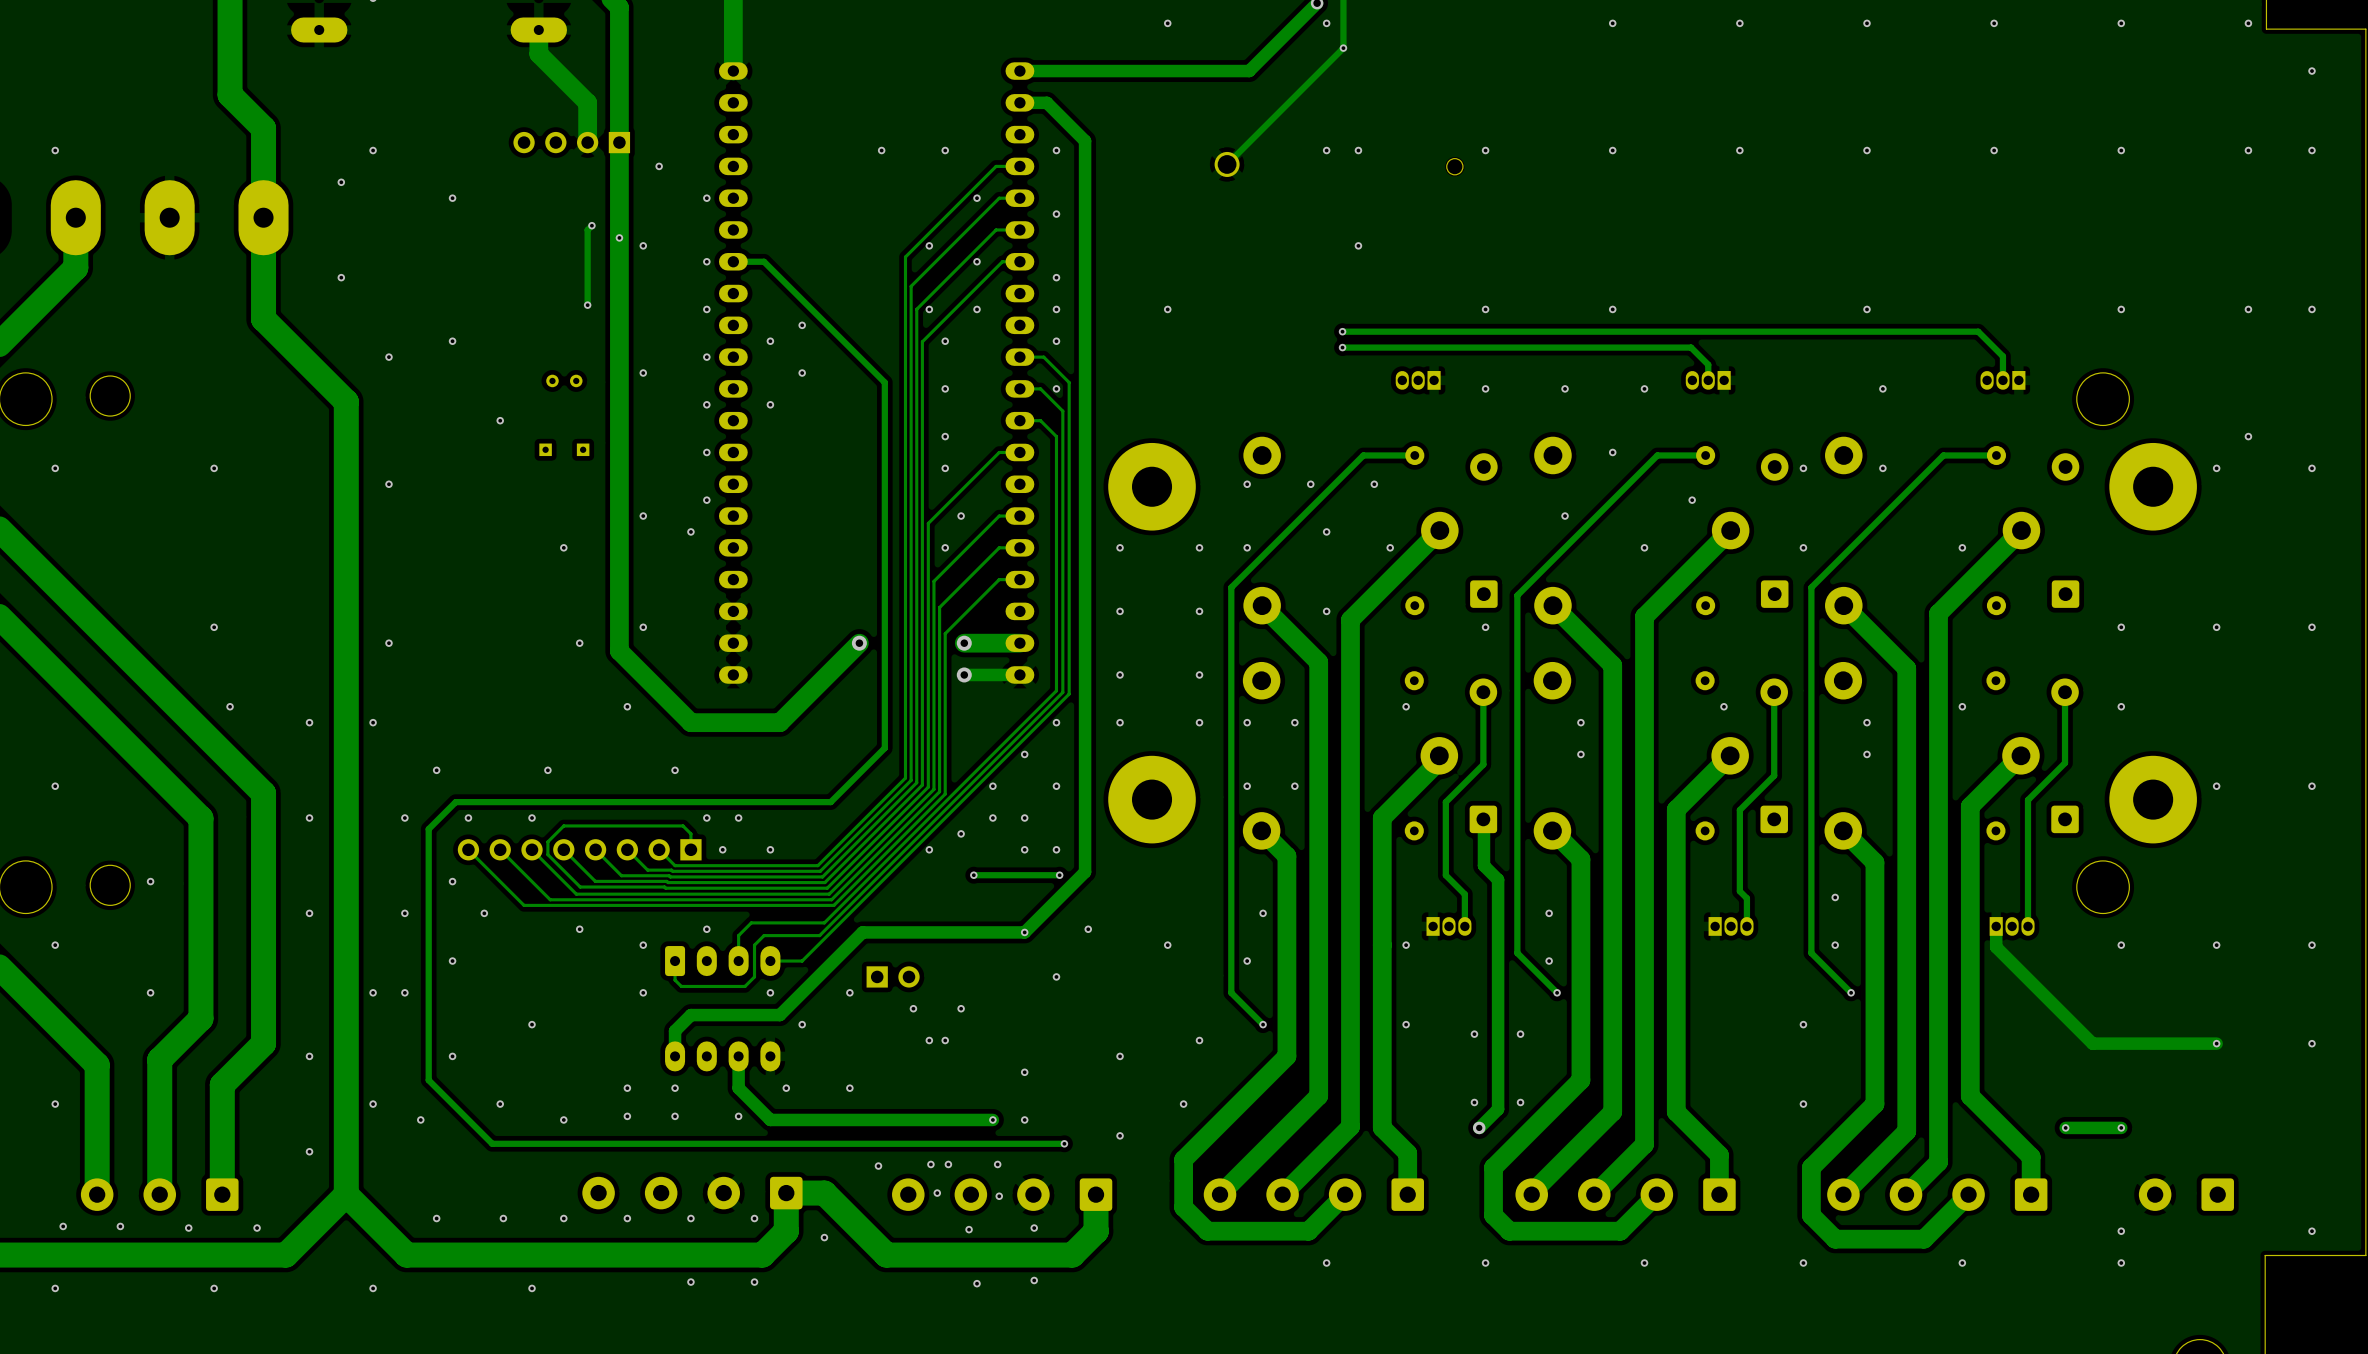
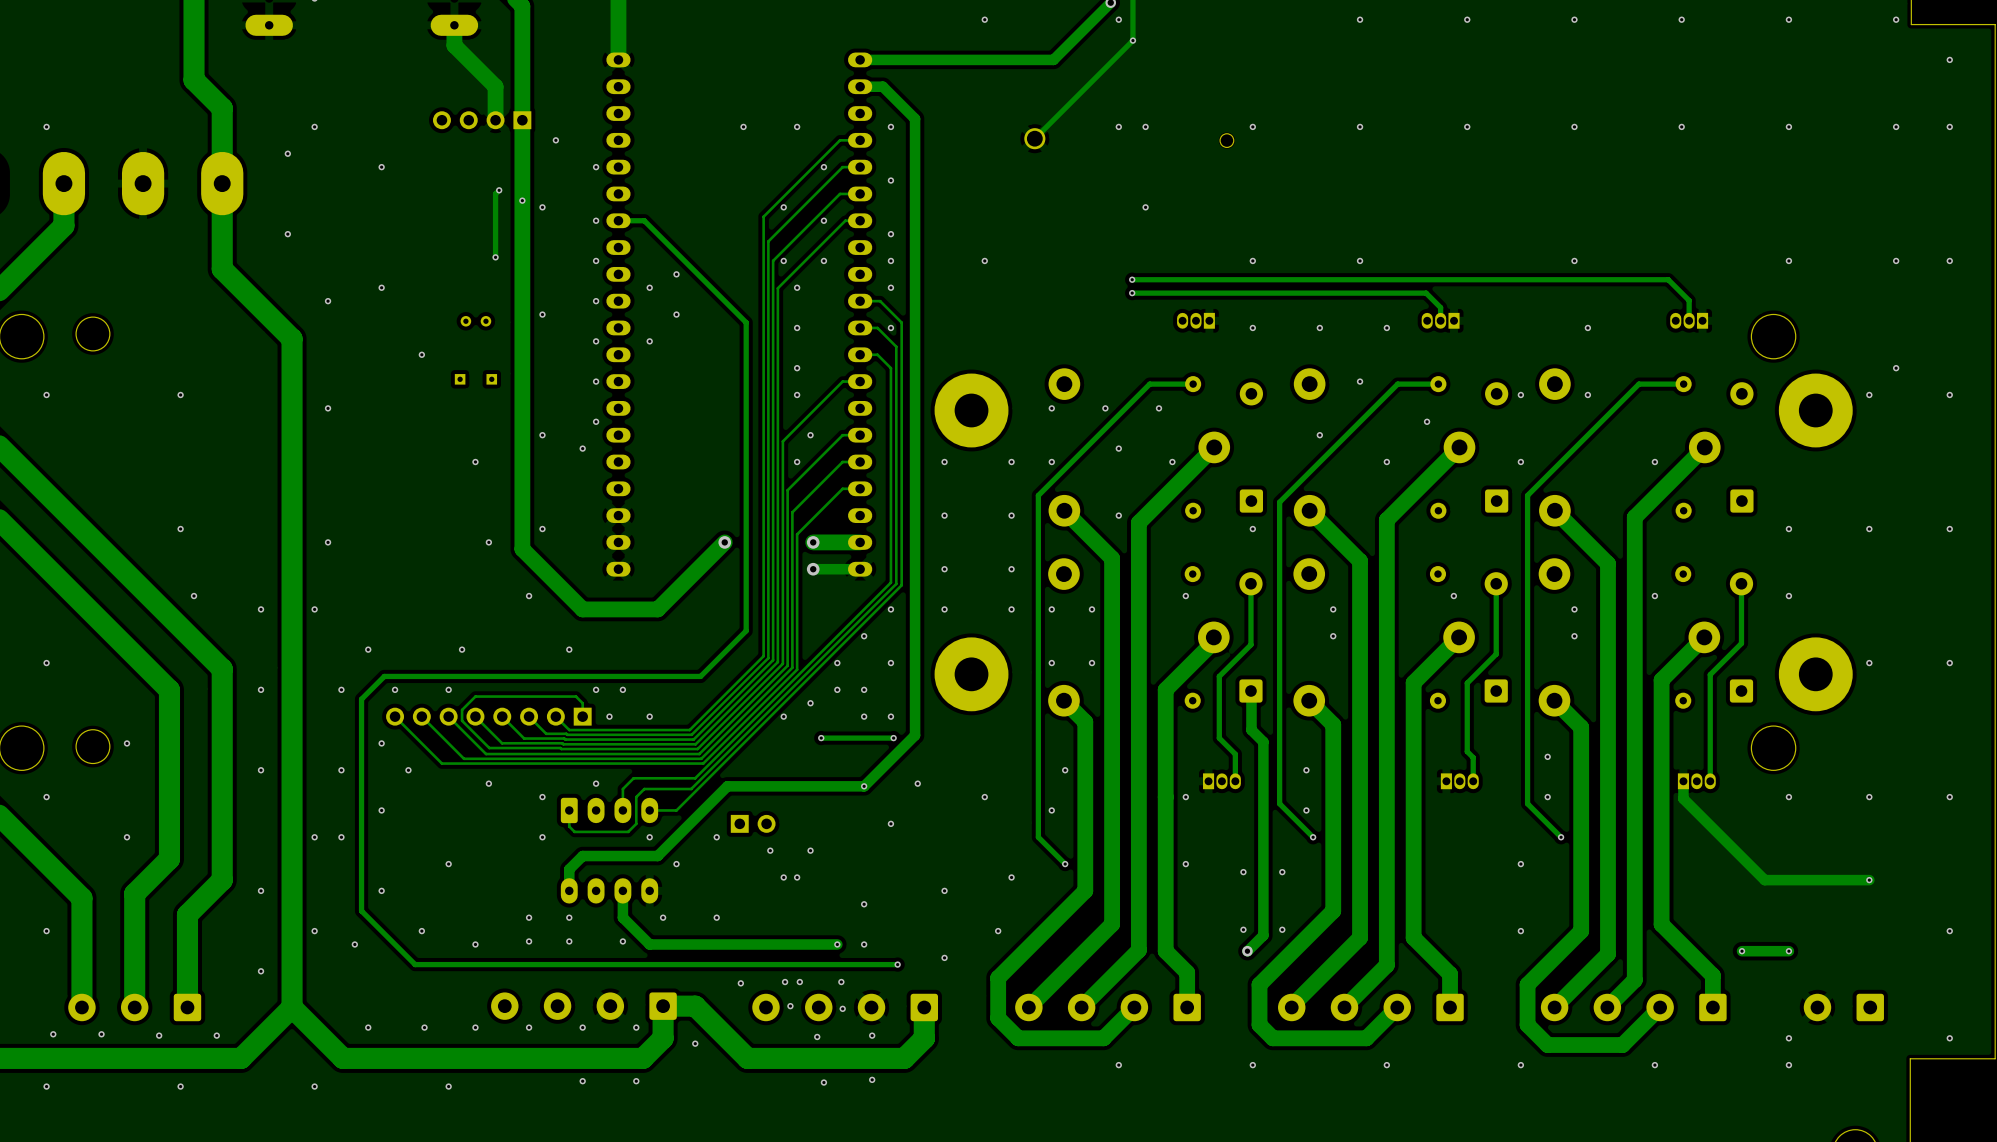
via position: (2311, 1043) -> (1949, 931)

